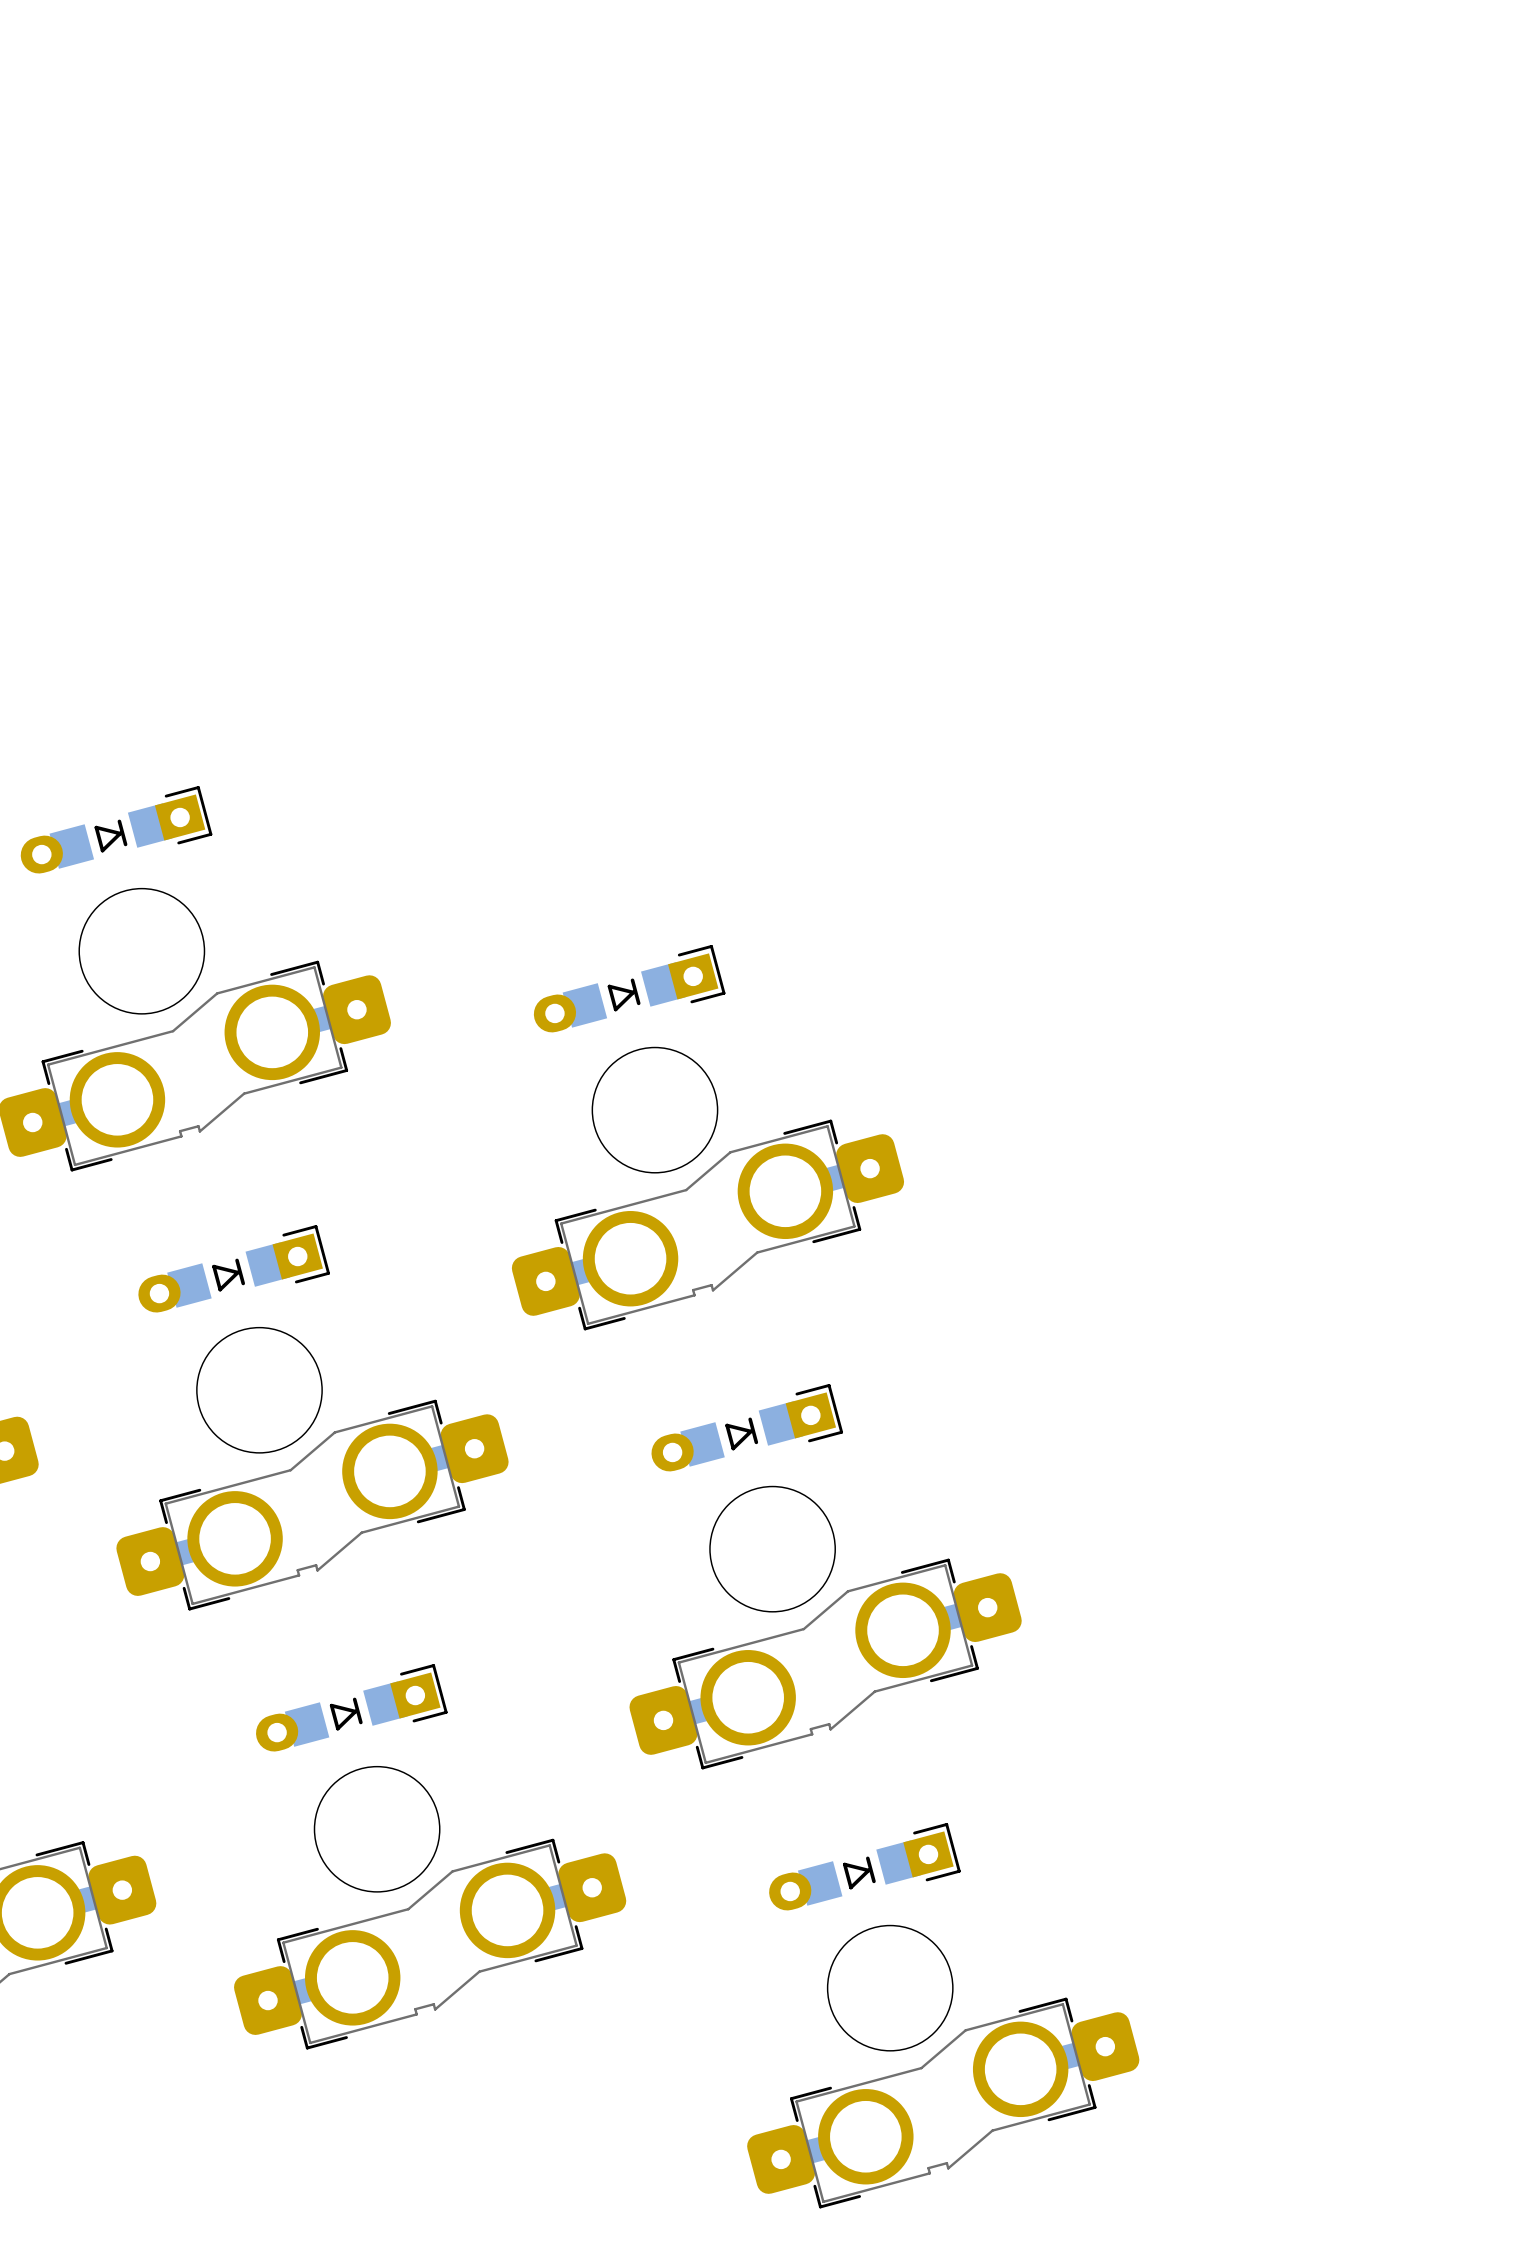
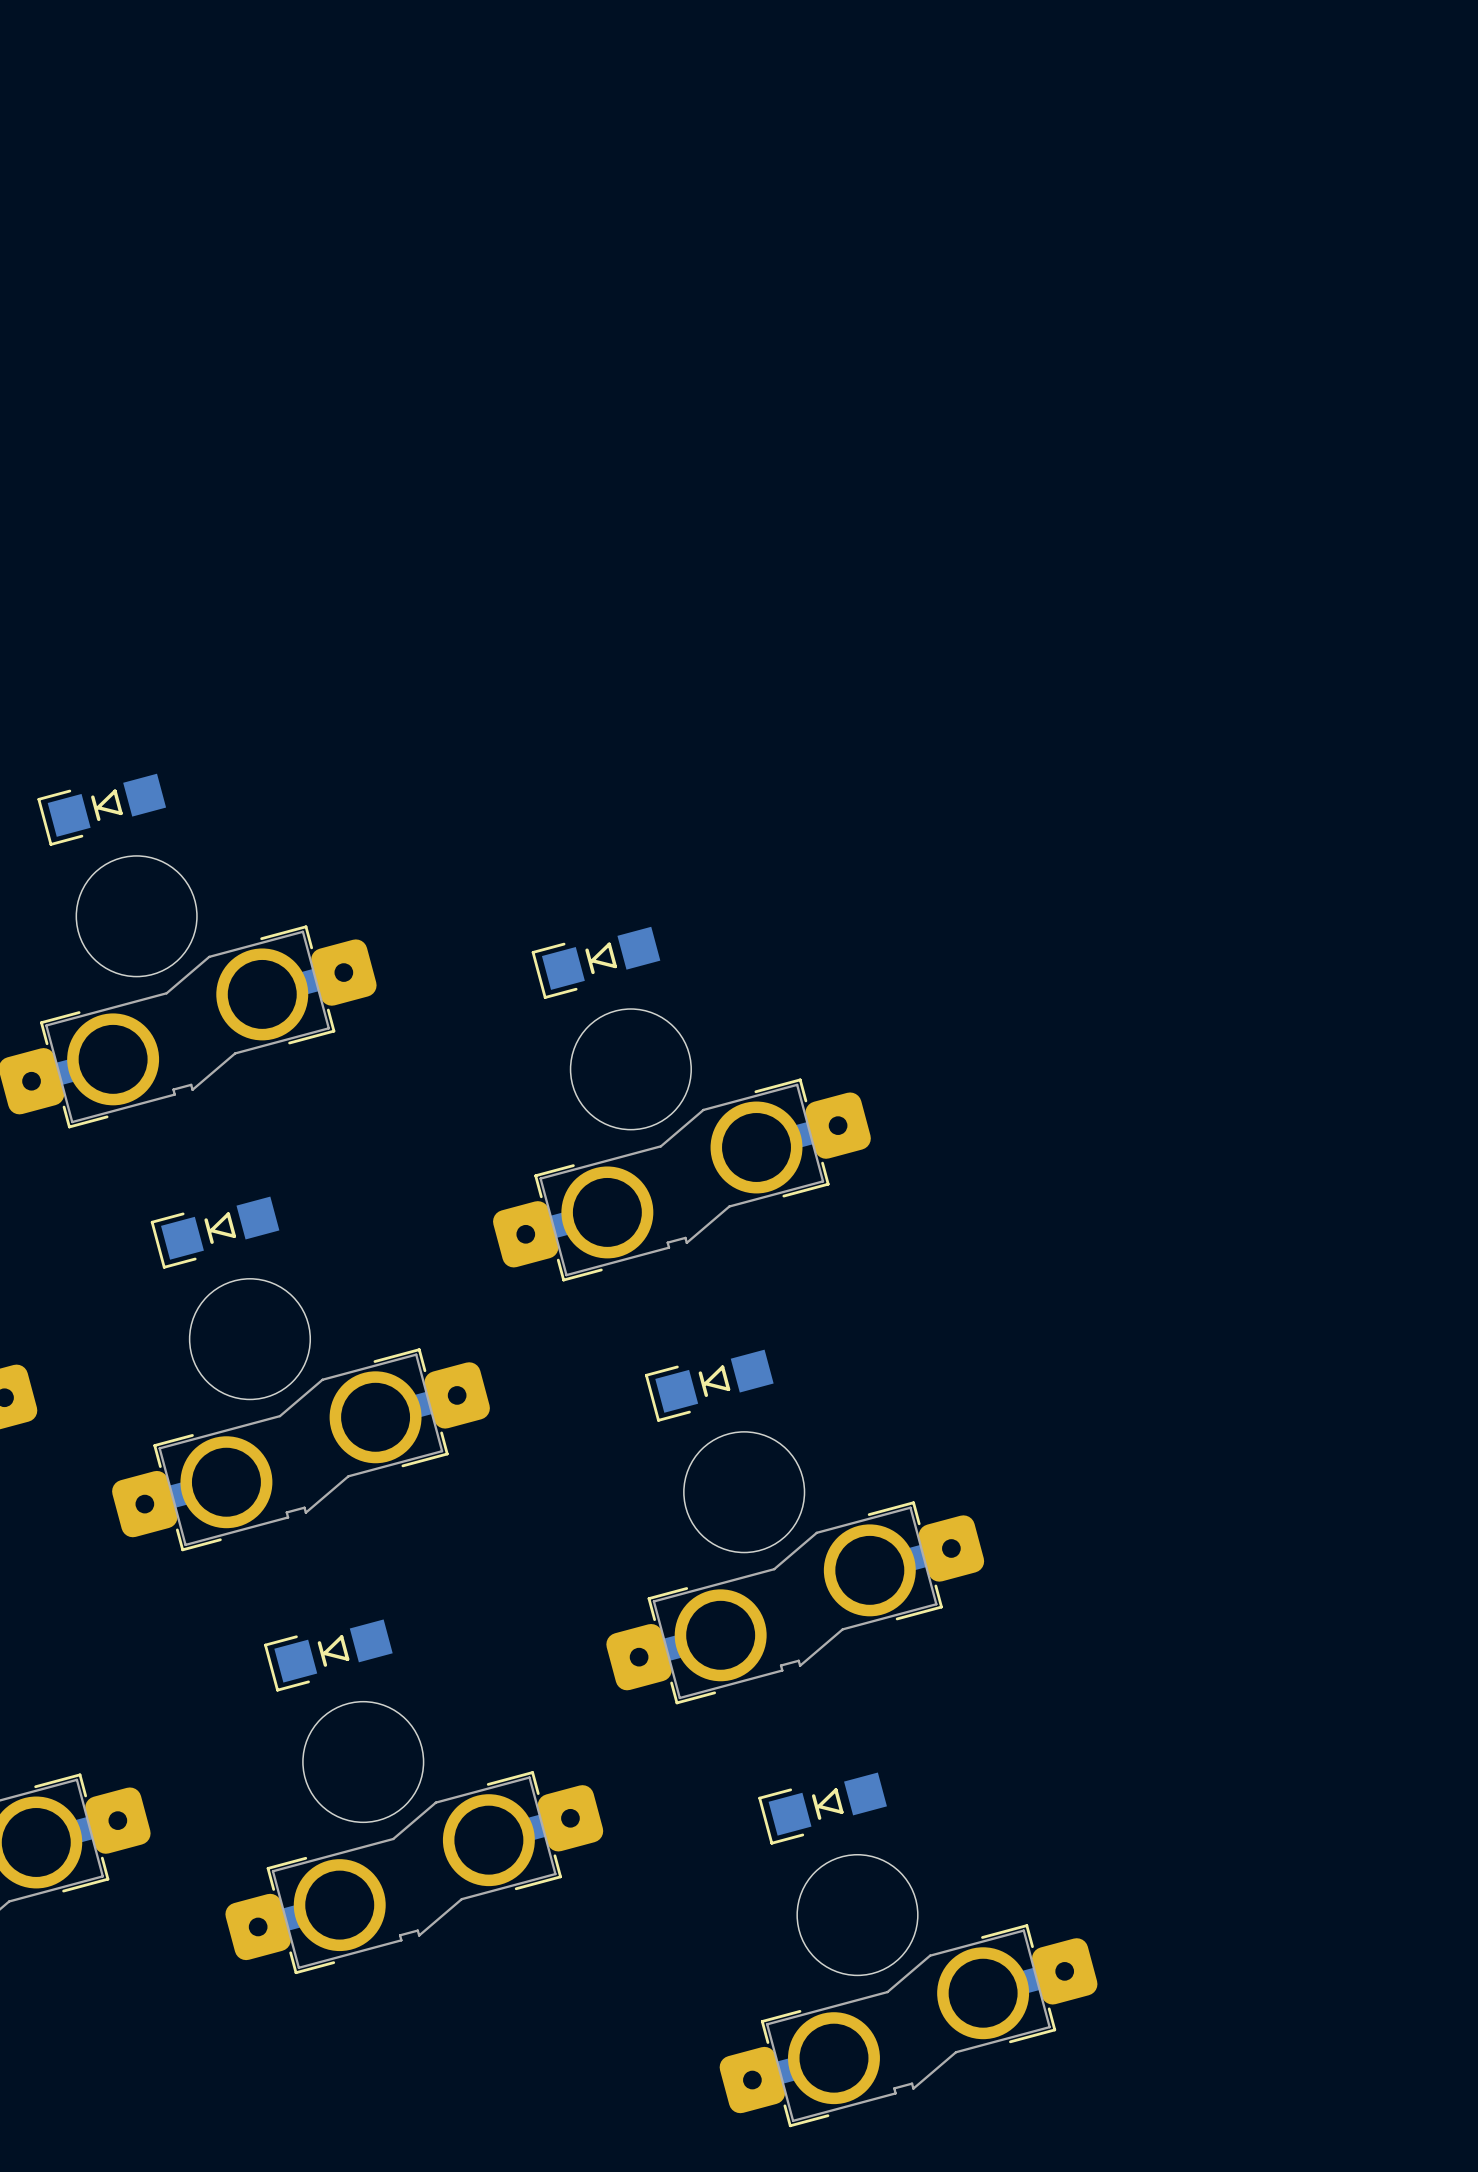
part footprint: [20, 786, 213, 874] -> [37, 773, 167, 846]
part footprint: [533, 944, 726, 1033] -> [531, 926, 661, 999]
part footprint: [138, 1225, 330, 1313] -> [150, 1196, 280, 1269]
part footprint: [651, 1384, 844, 1472] -> [645, 1349, 774, 1422]
part footprint: [256, 1664, 448, 1752] -> [264, 1619, 393, 1692]
part footprint: [769, 1823, 961, 1911] -> [758, 1772, 887, 1845]

